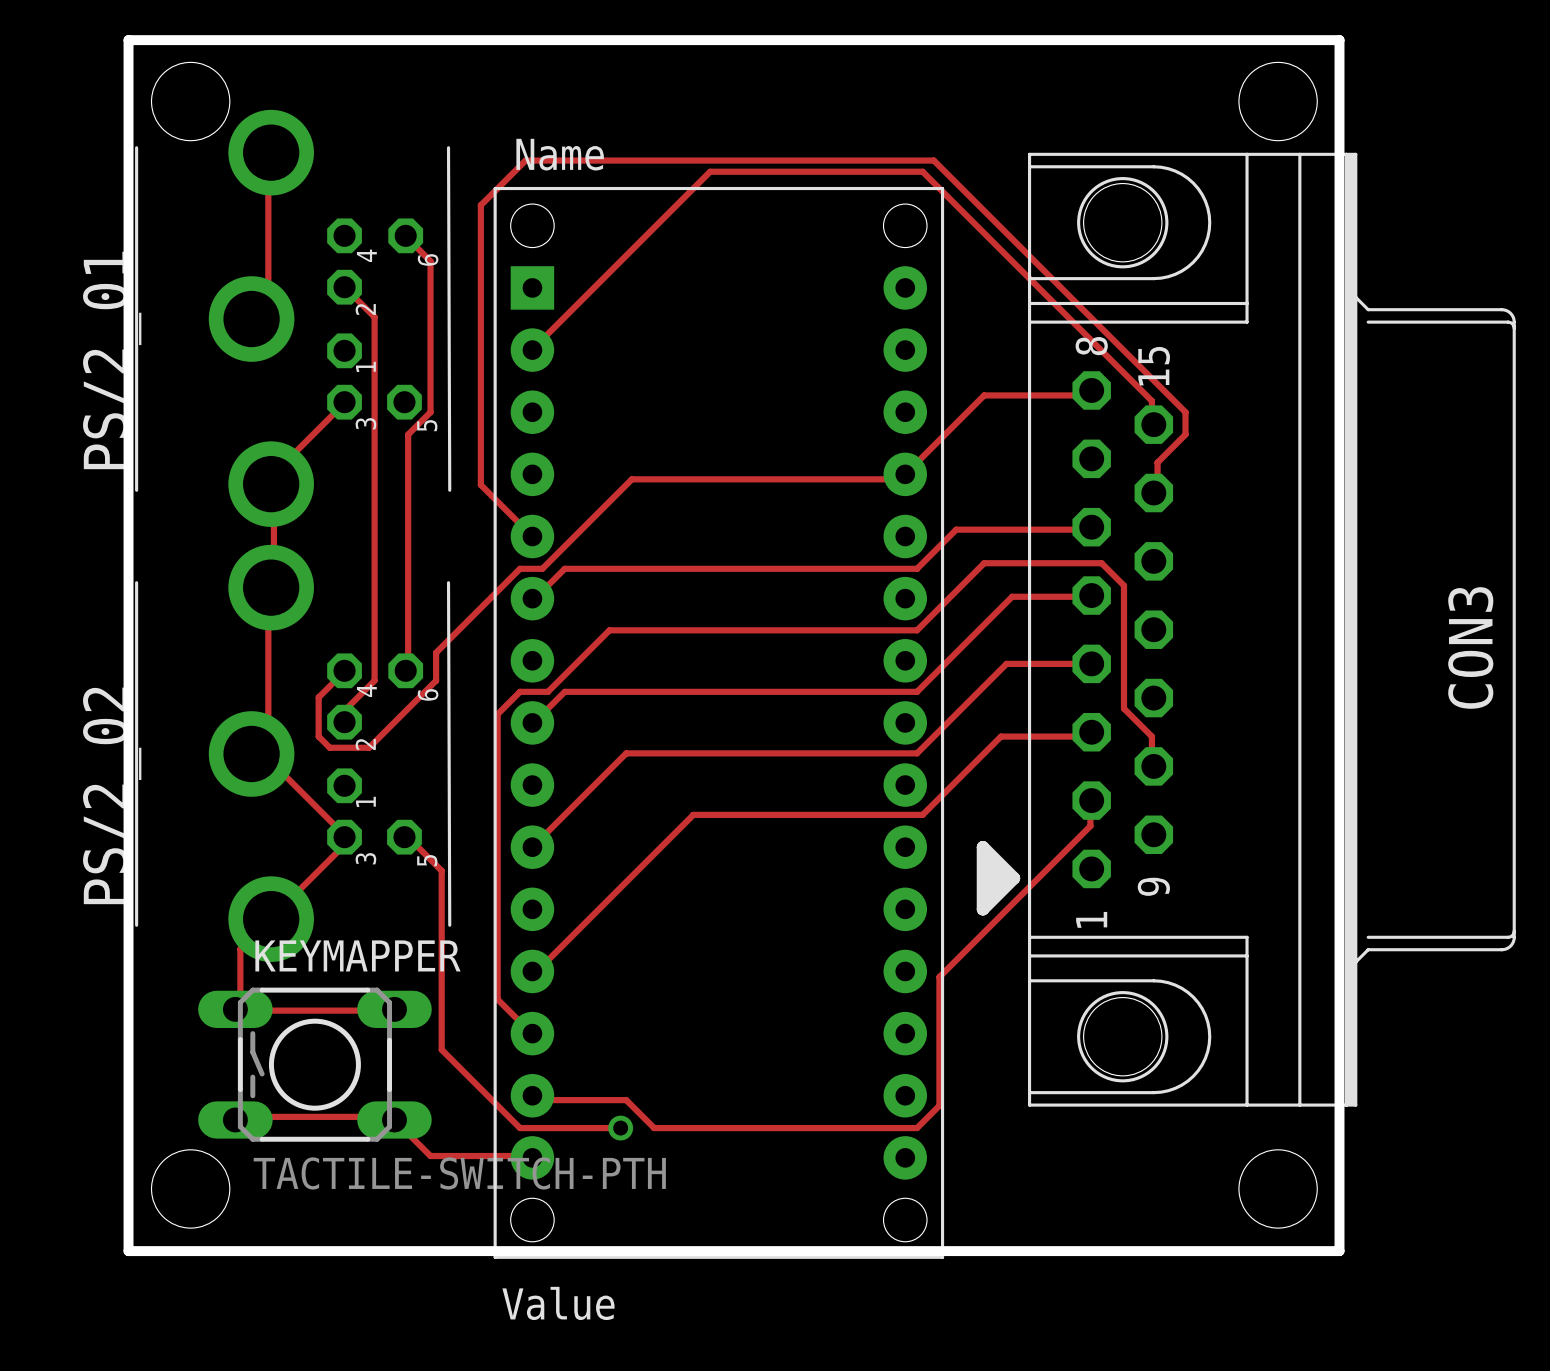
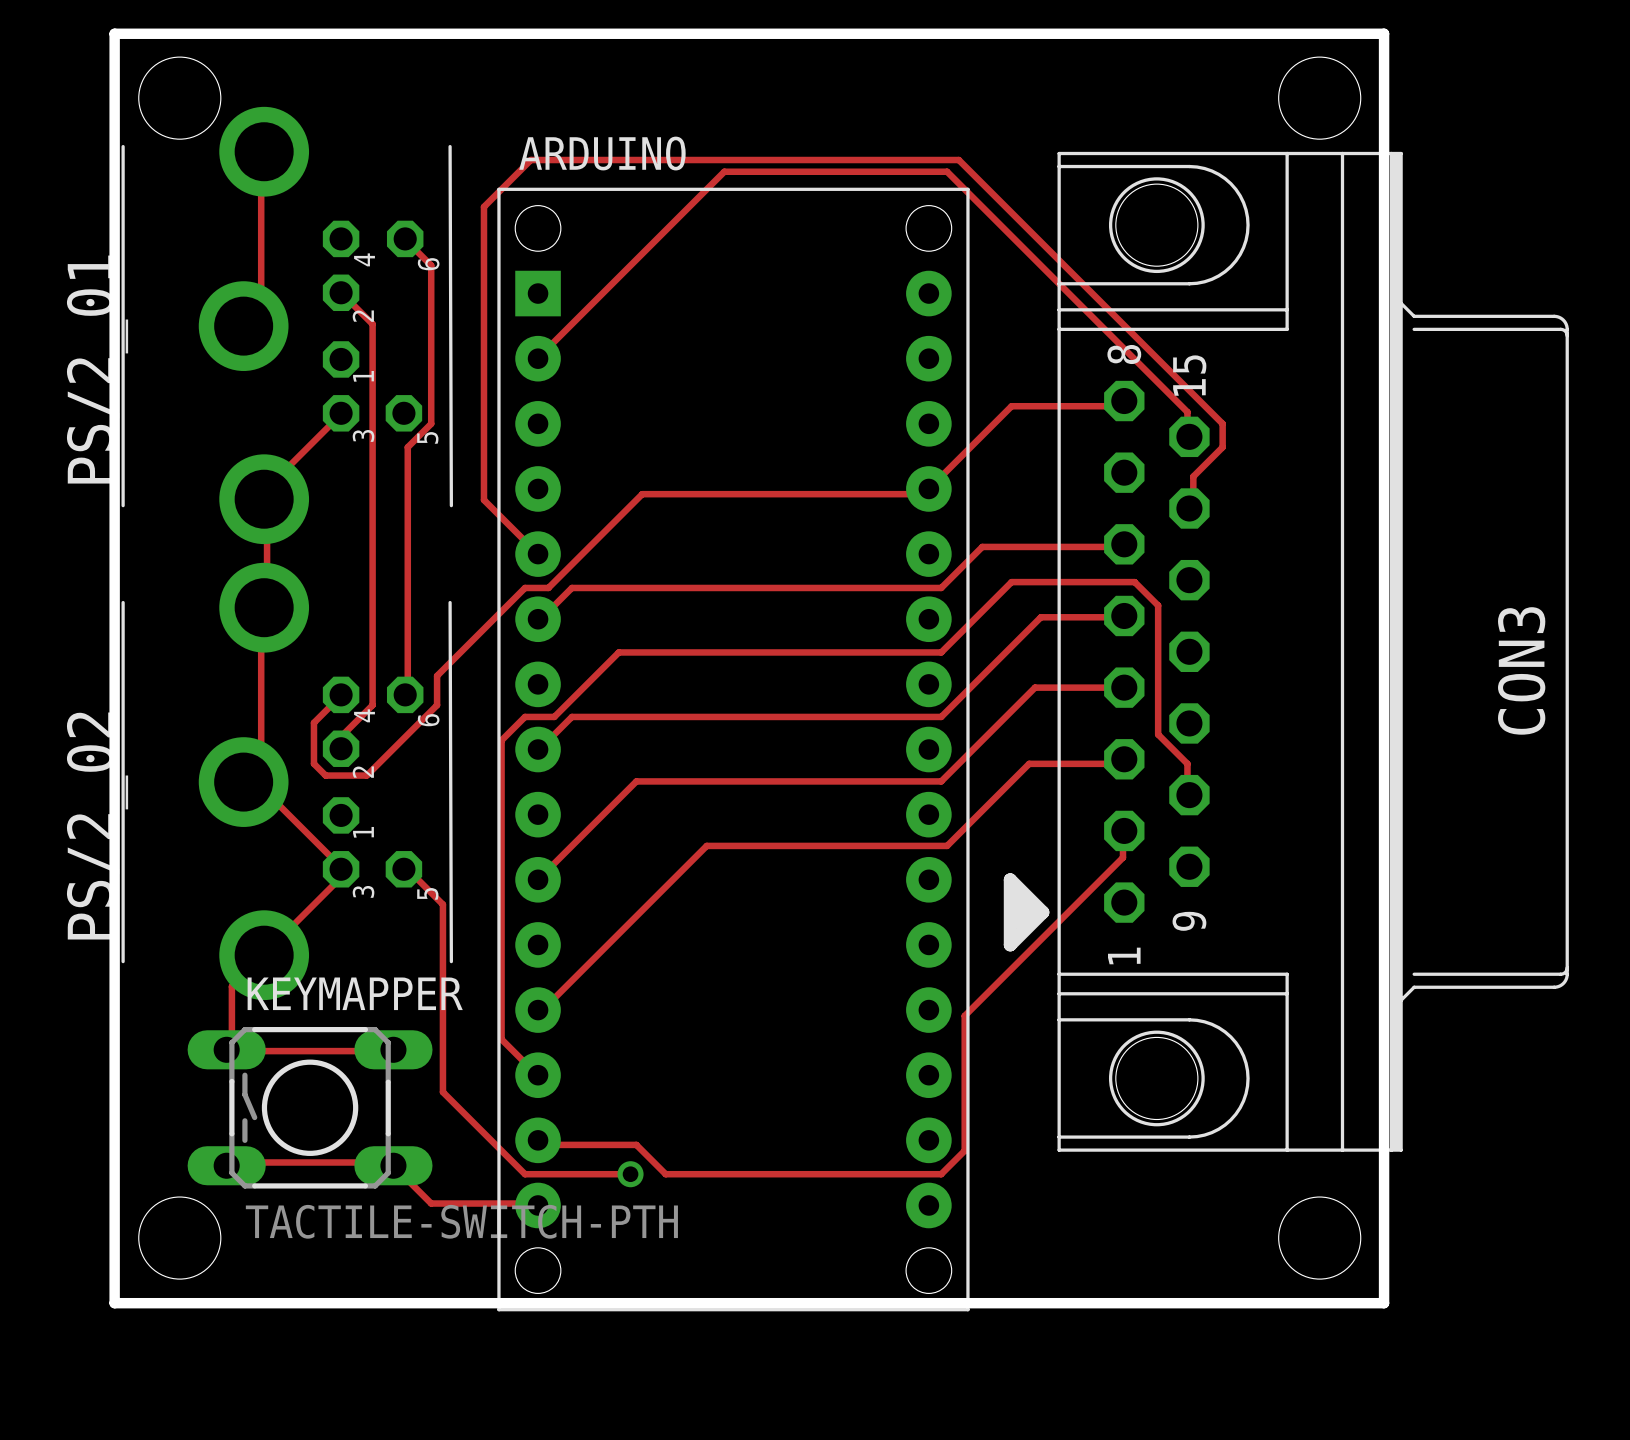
part text: Name (560, 154) -> ARDUINO (602, 153)
part text: Value (558, 1303) -> none

